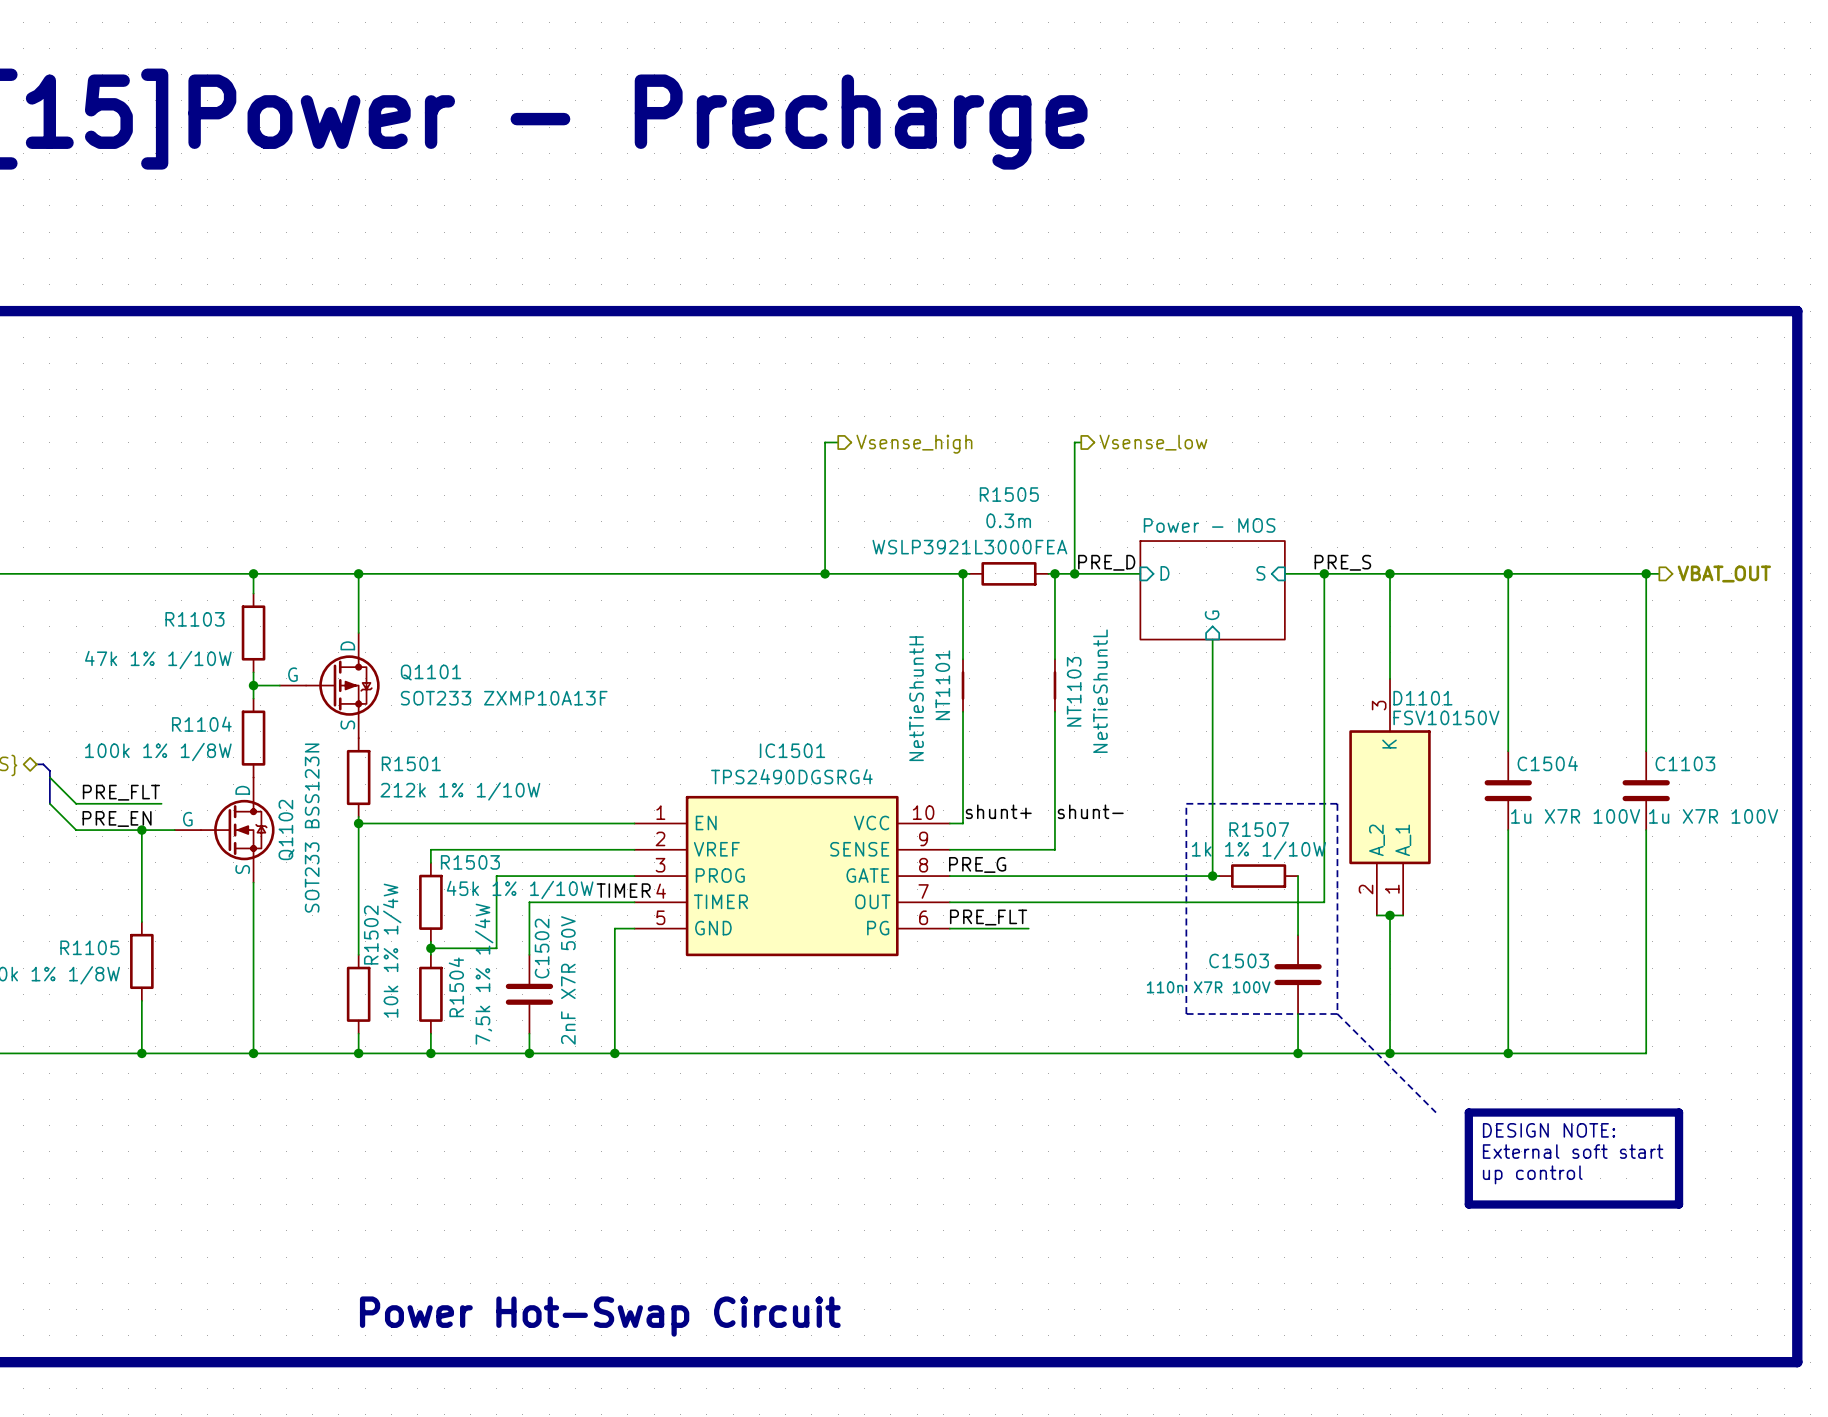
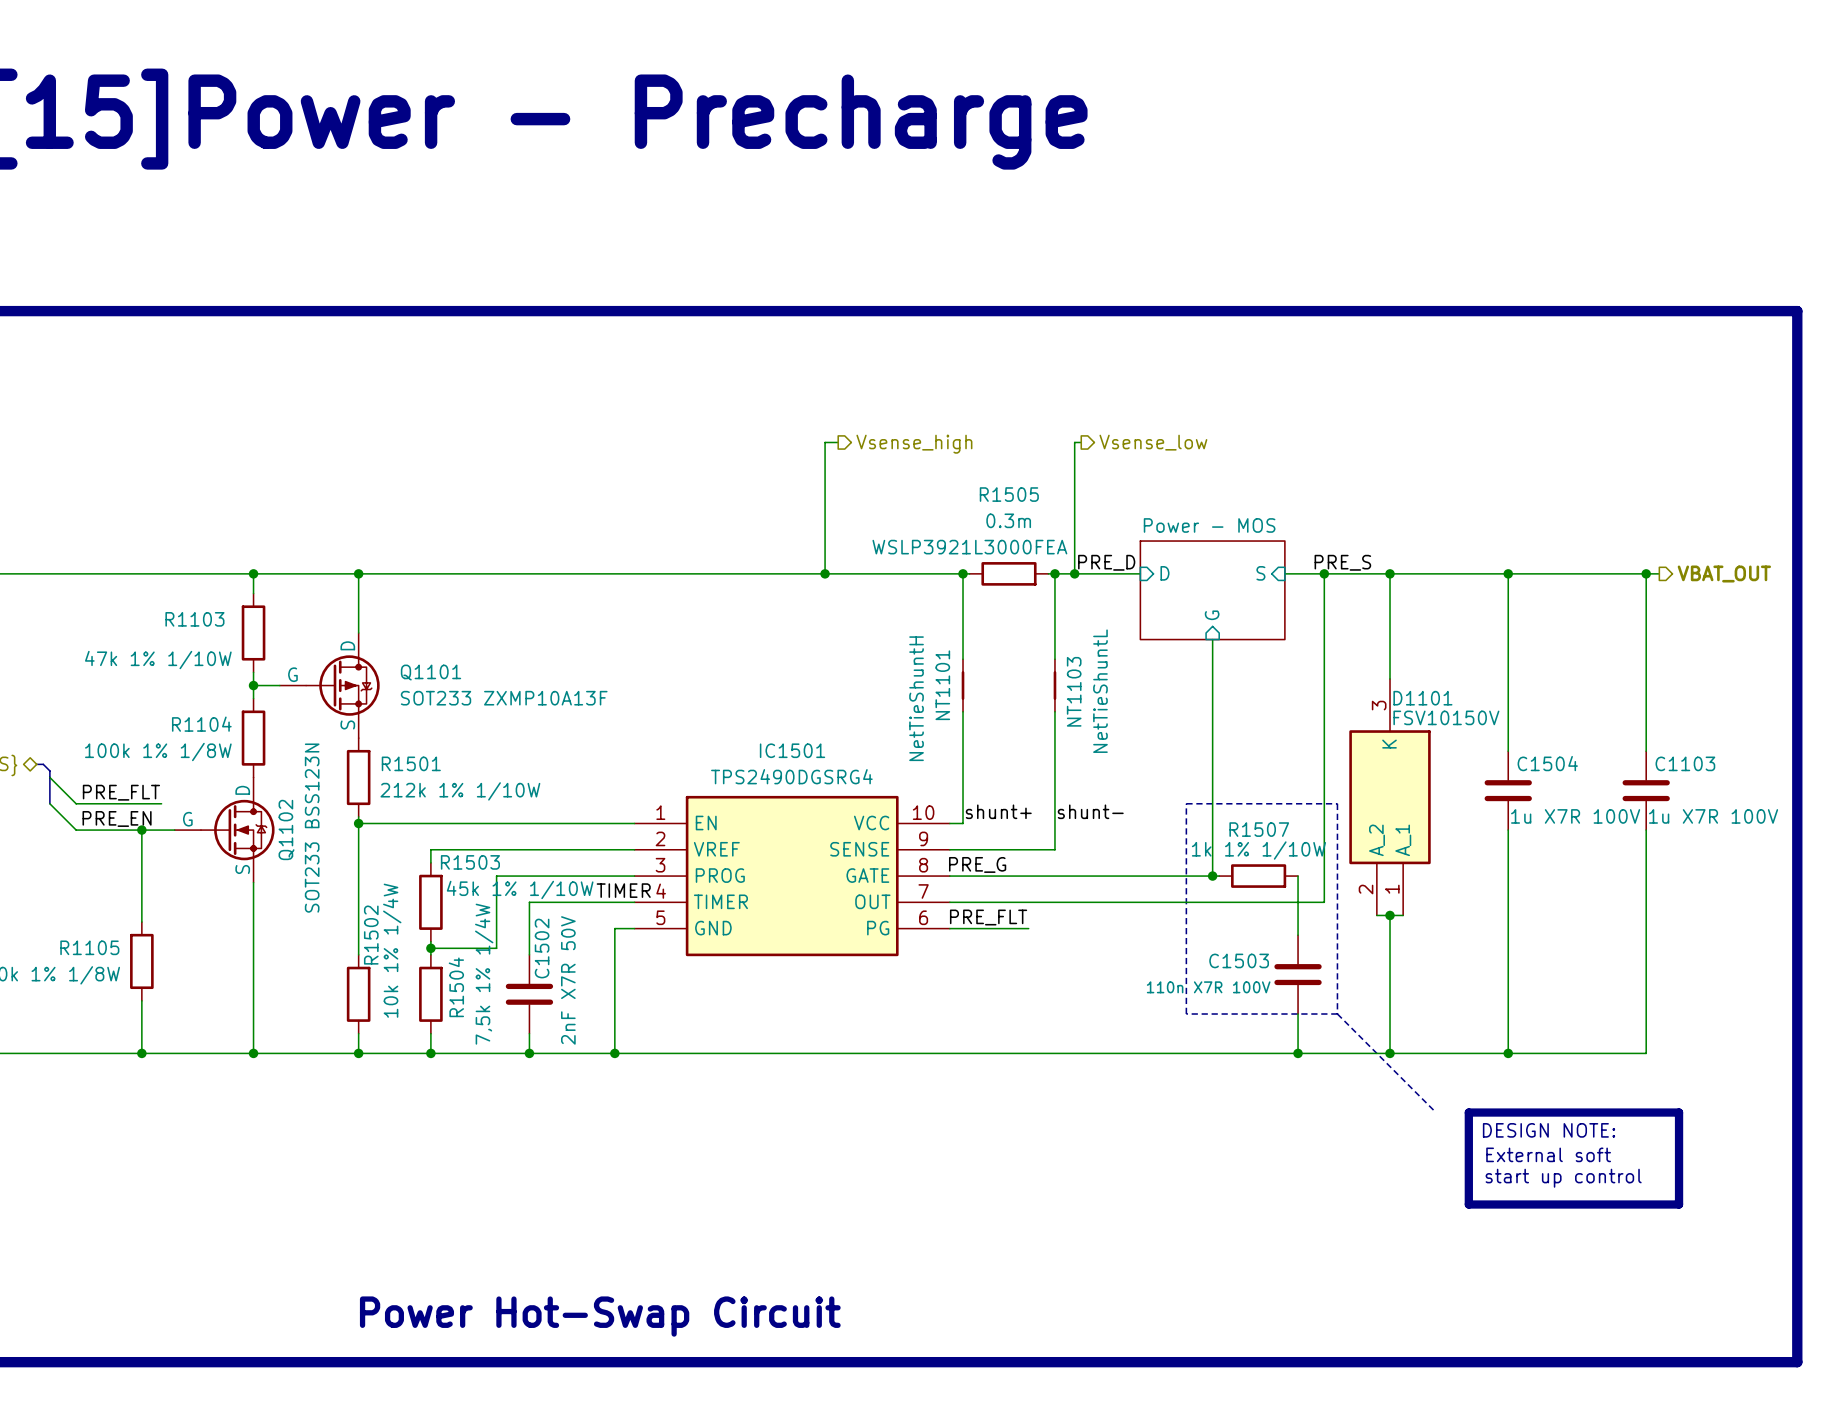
text: External soft start (1573, 1151) -> External soft (1548, 1154)
text: up control (1532, 1174) -> start up control (1563, 1178)

